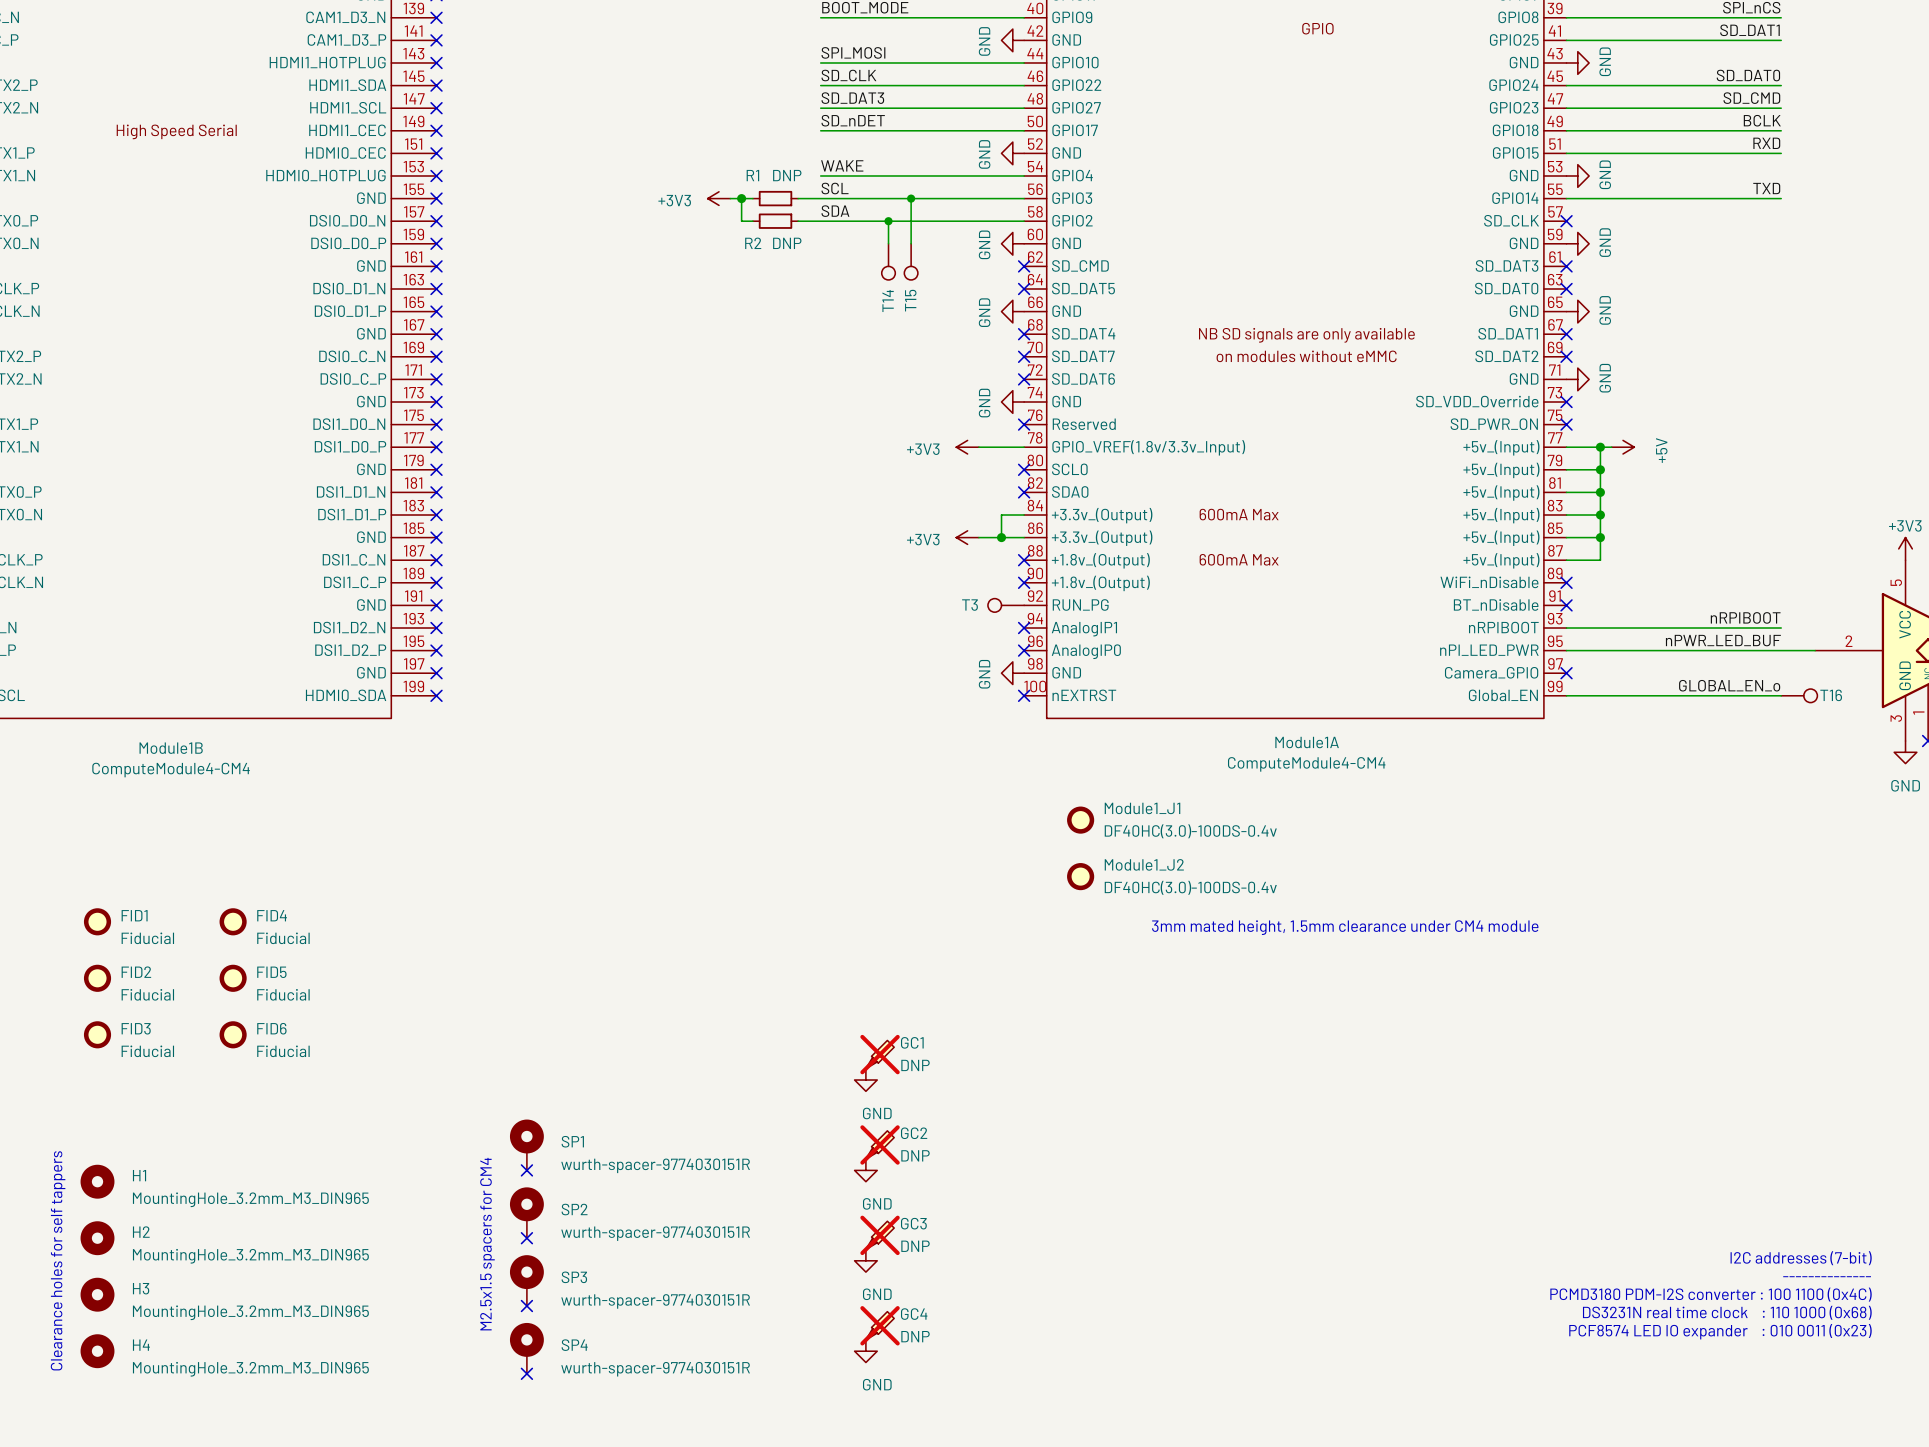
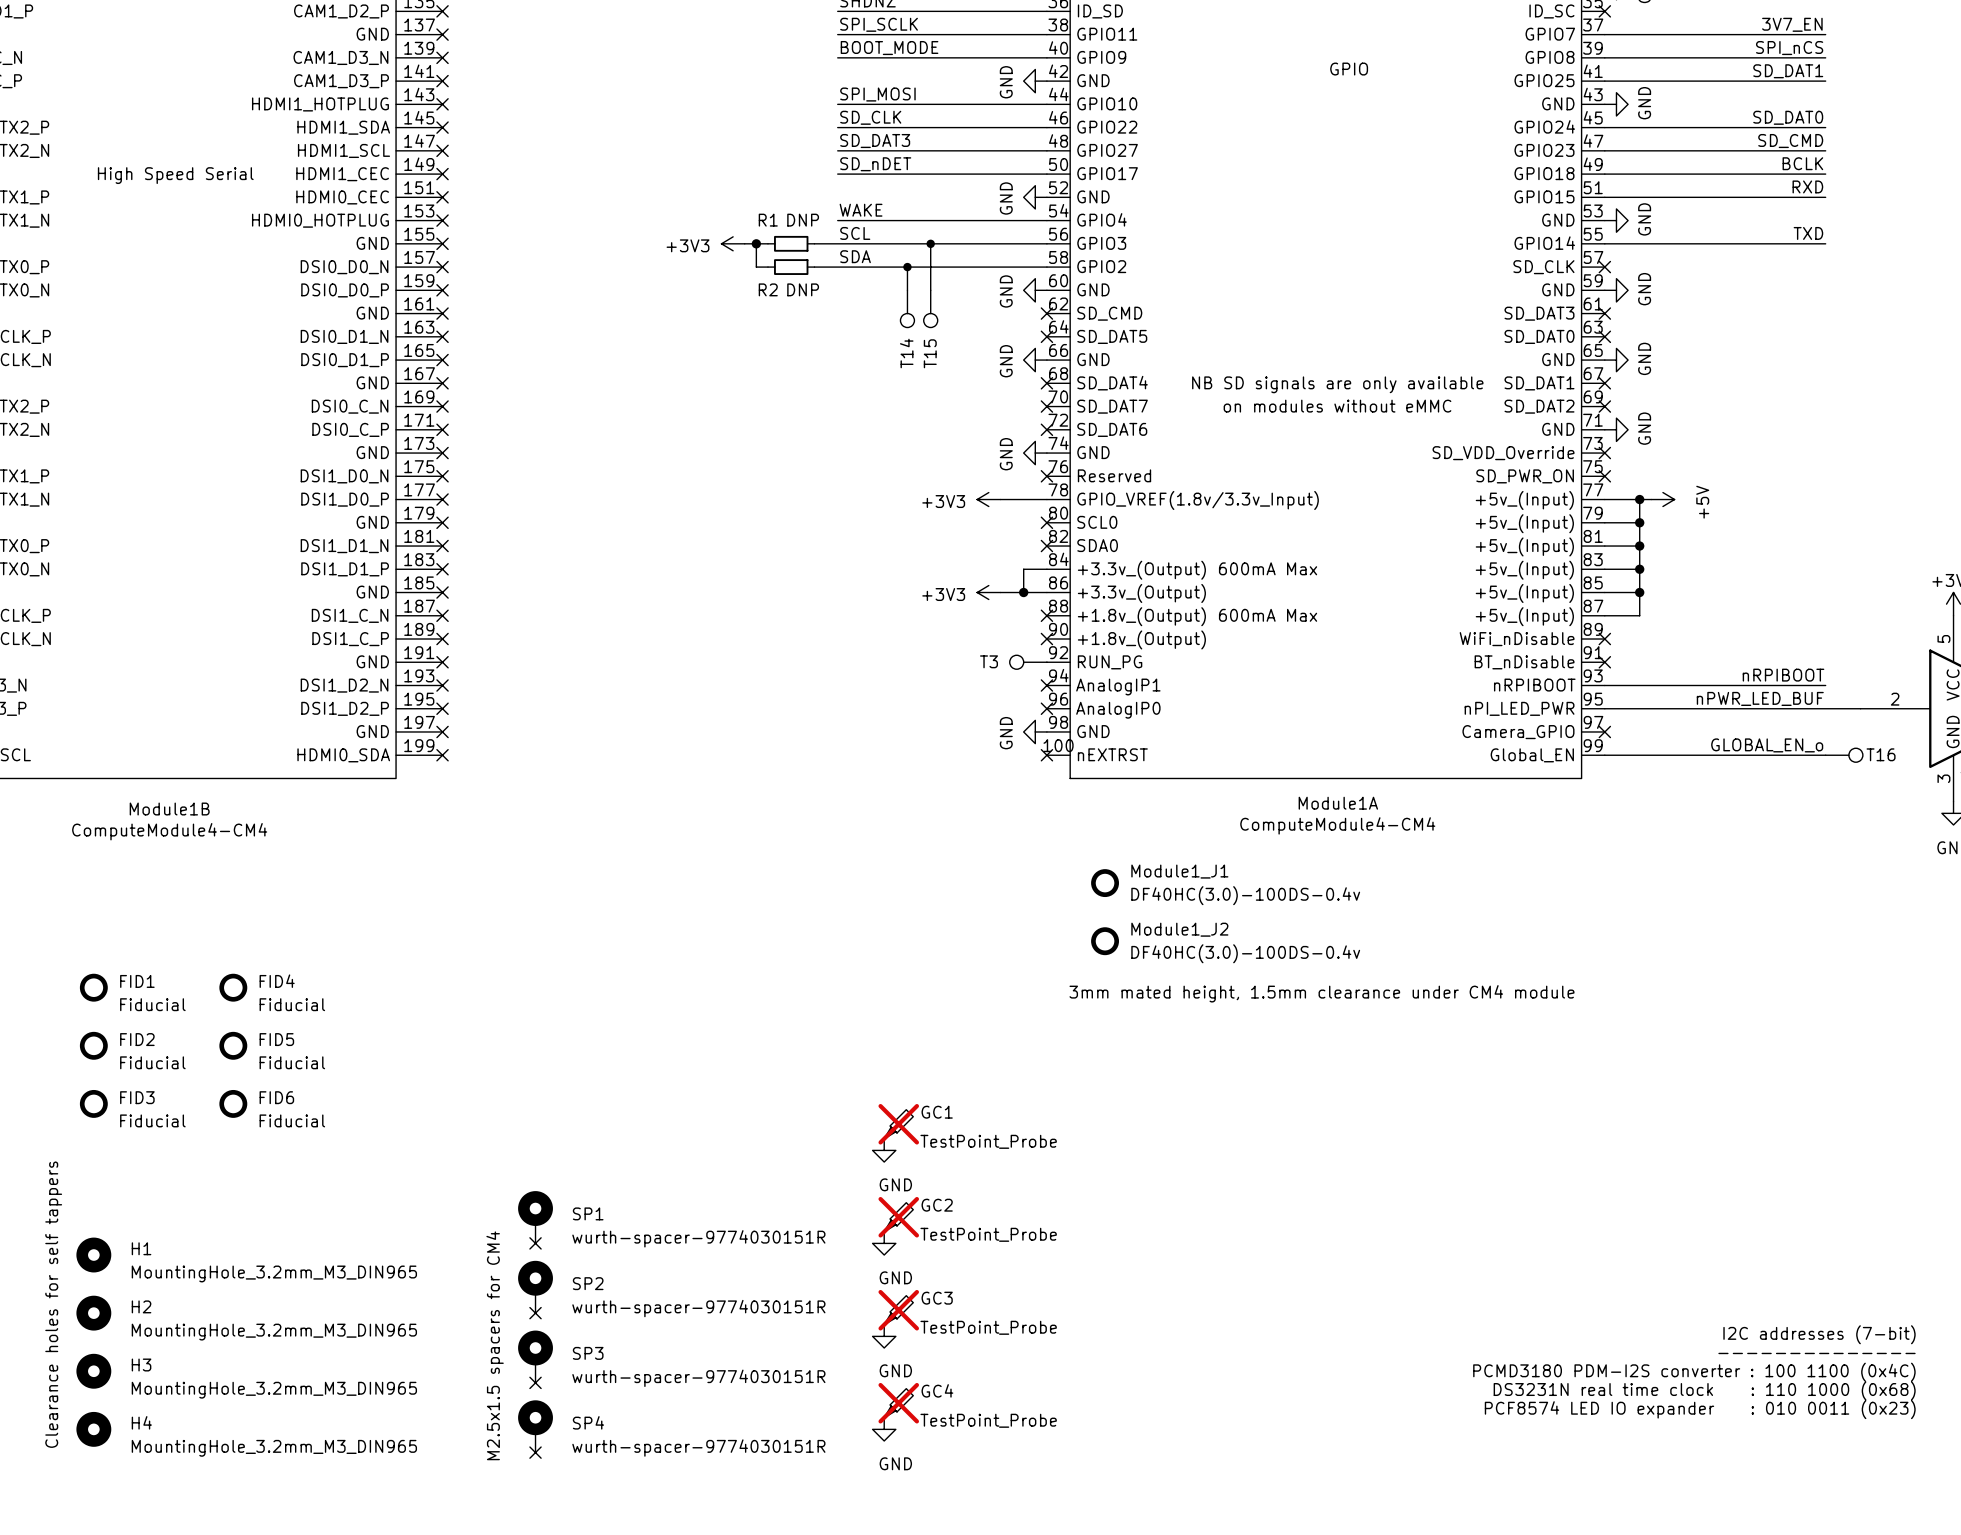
GC1 value: DNP (915, 1065) -> TestPoint_Probe (988, 1141)
GC2 value: DNP (915, 1155) -> TestPoint_Probe (988, 1234)
GC3 value: DNP (915, 1246) -> TestPoint_Probe (988, 1327)
GC4 value: DNP (915, 1336) -> TestPoint_Probe (988, 1420)

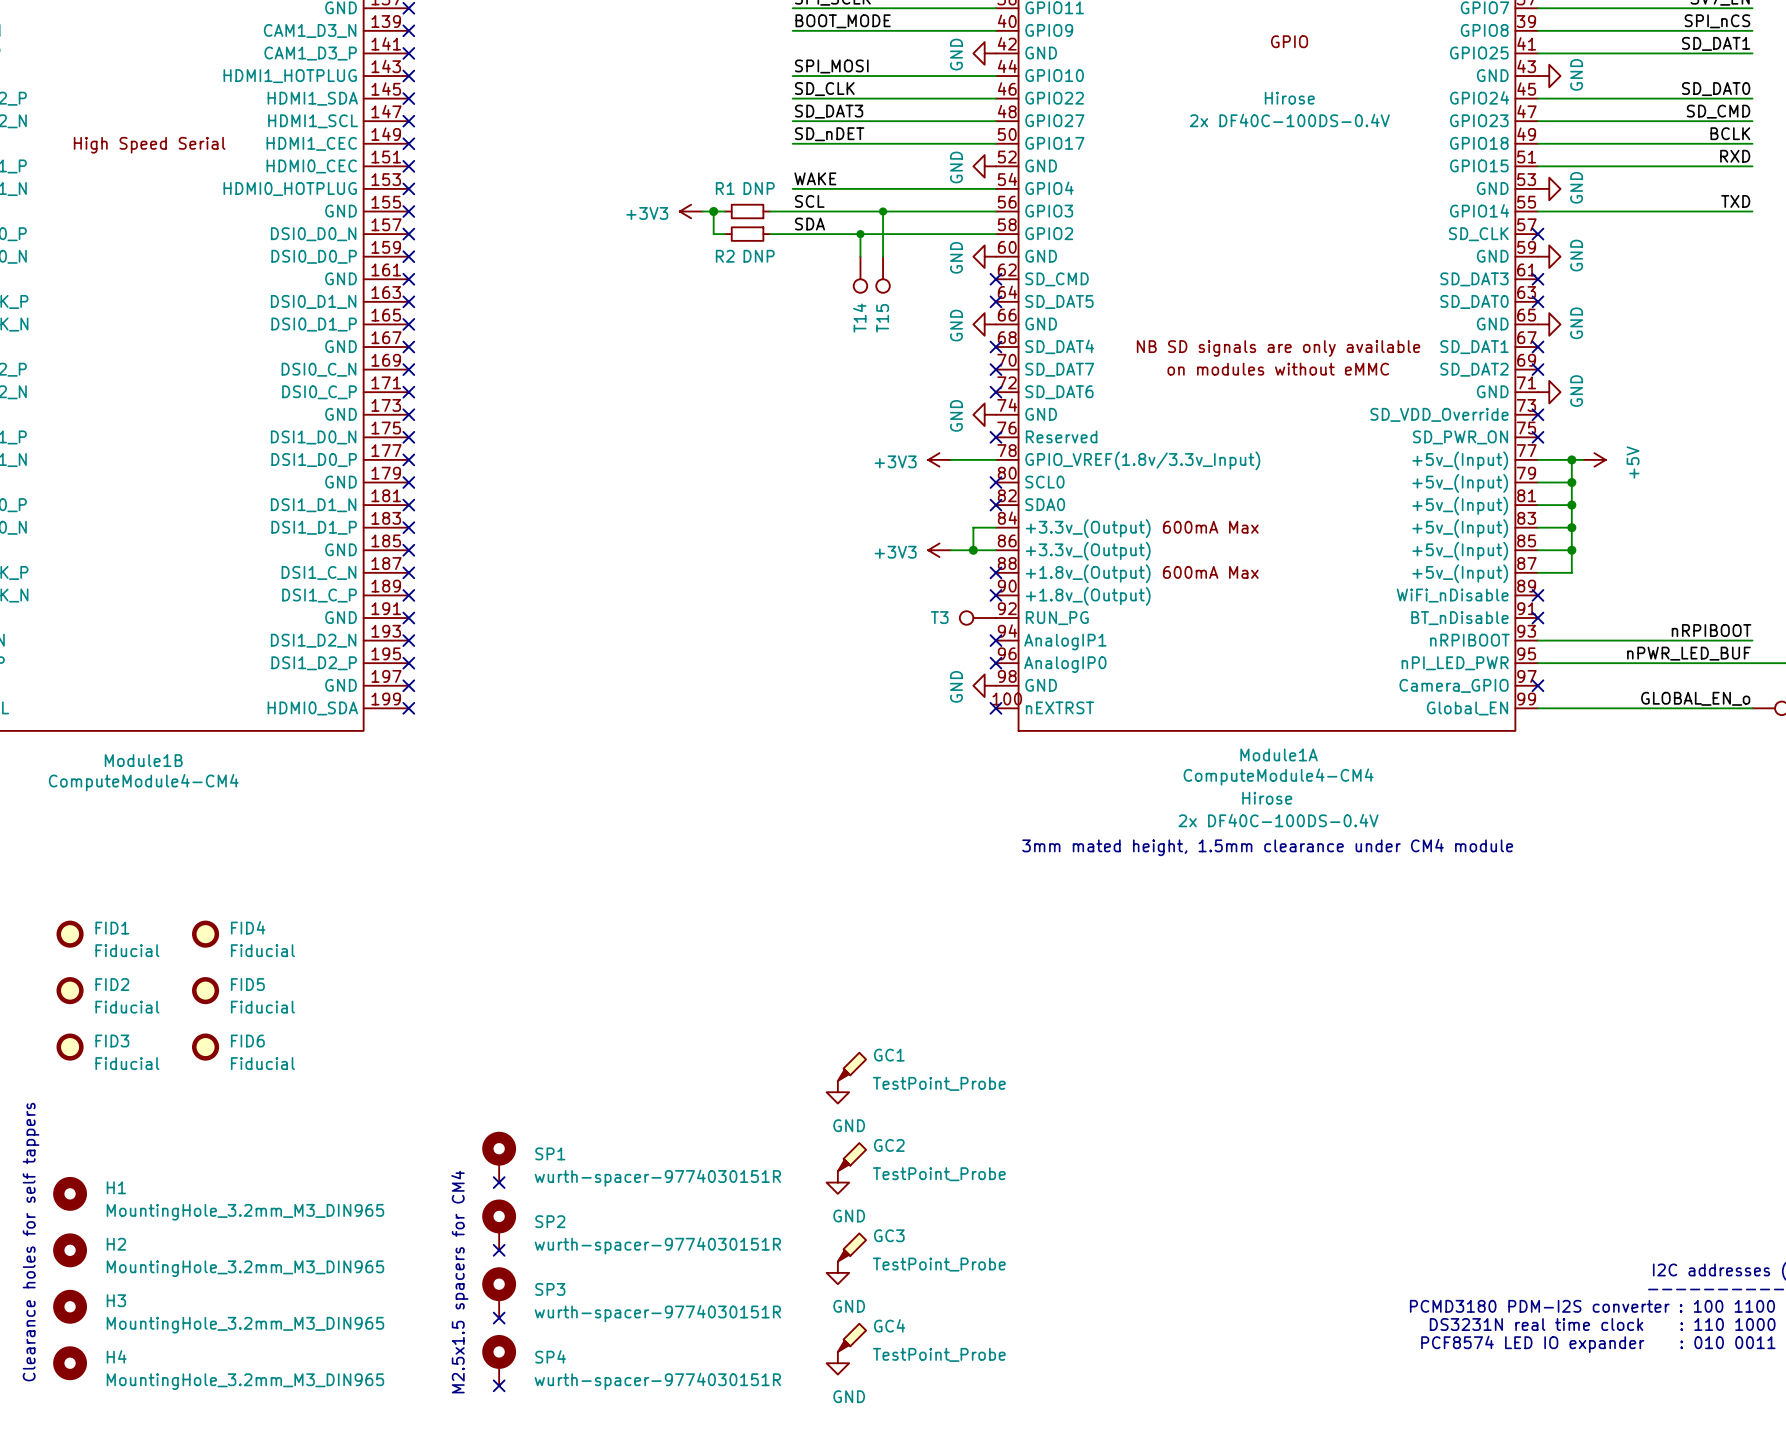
Module1A text: none -> Hirose (1289, 98)
Module1A text: none -> 2x DF40C-100DS-0.4V (1289, 120)
Module1B text: none -> Hirose (1267, 798)
Module1B text: none -> 2x DF40C-100DS-0.4V (1278, 820)
Module1_J1: DF40HC(3.0)-100DS-0.4v (1105, 883) -> none
Module1_J2: DF40HC(3.0)-100DS-0.4v (1105, 941) -> none
text position: 3mm mated height, 1.5mm clearance under CM4 module (1321, 993) -> 3mm mated height, 1.5mm clearance under CM4 module (1267, 847)
GC1 do-not-place cross: (898, 1124) -> none
GC2 do-not-place cross: (898, 1217) -> none
GC3 do-not-place cross: (898, 1310) -> none
GC4 do-not-place cross: (898, 1403) -> none

